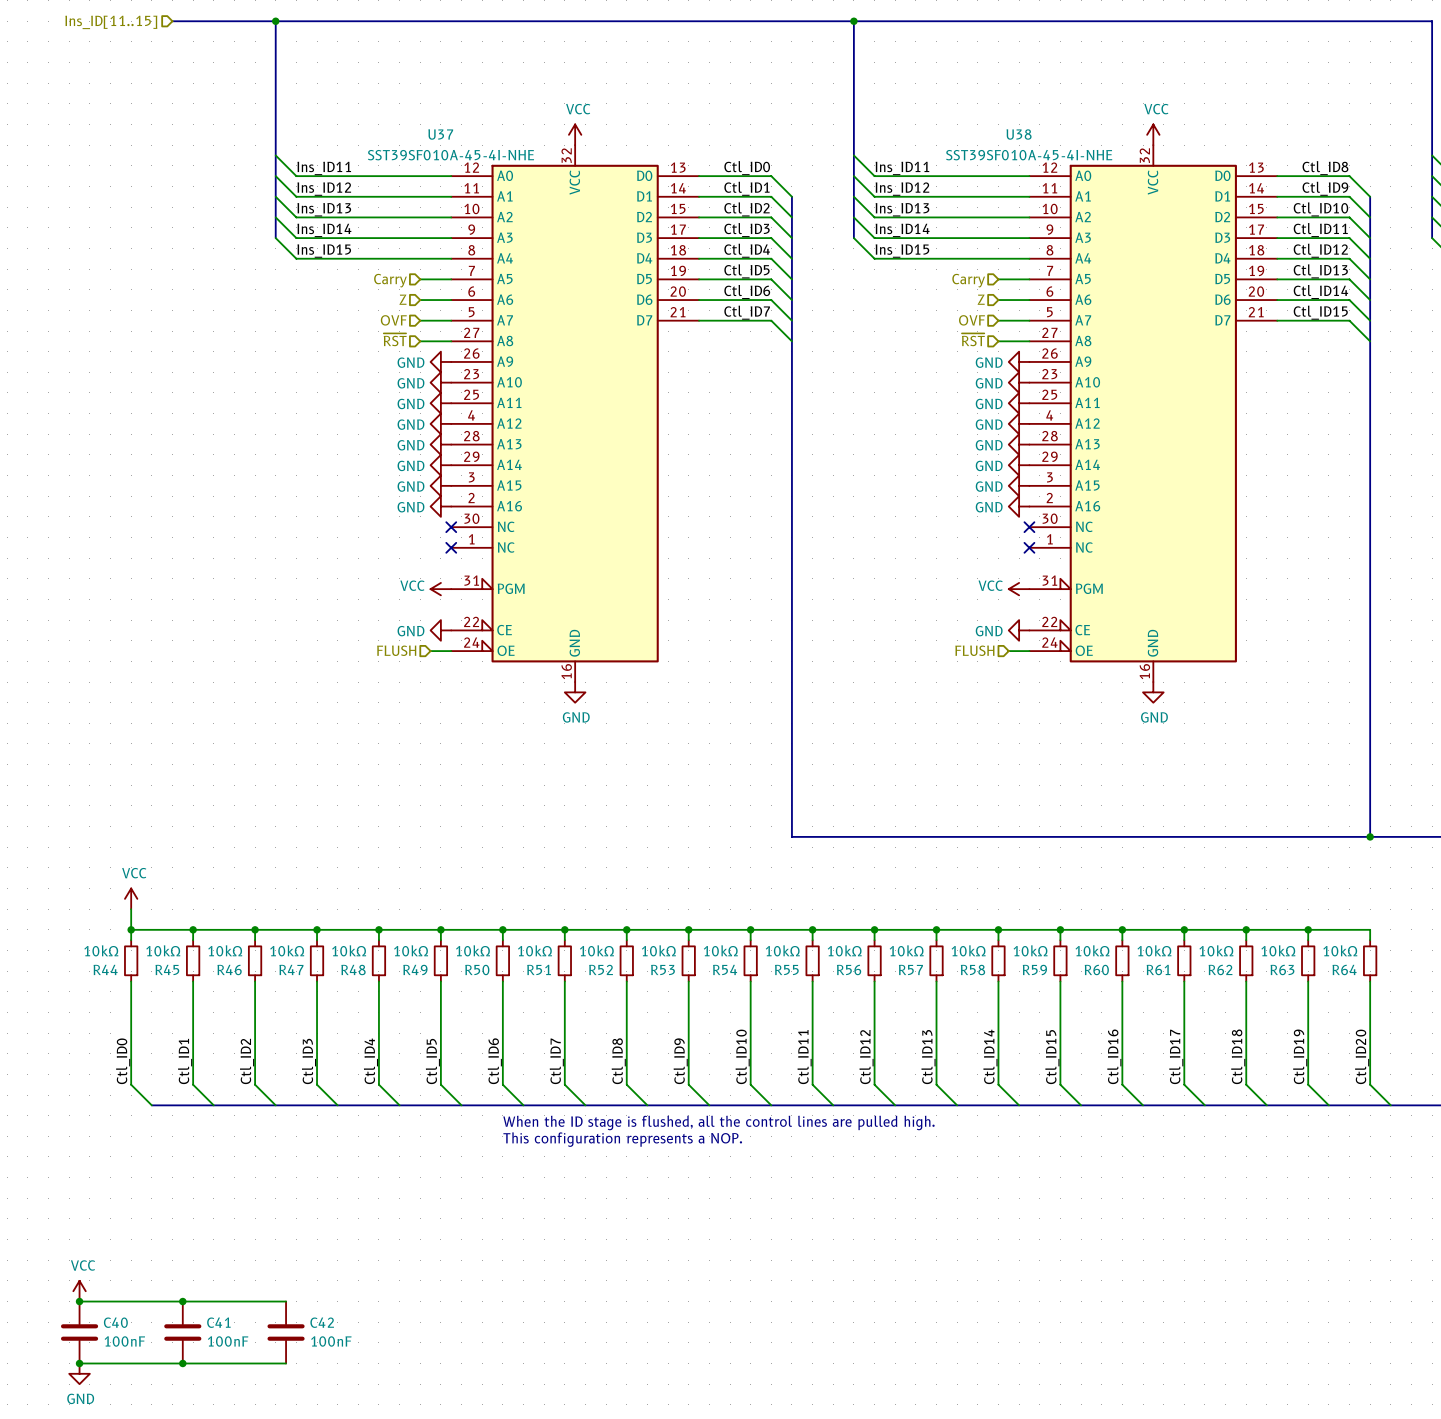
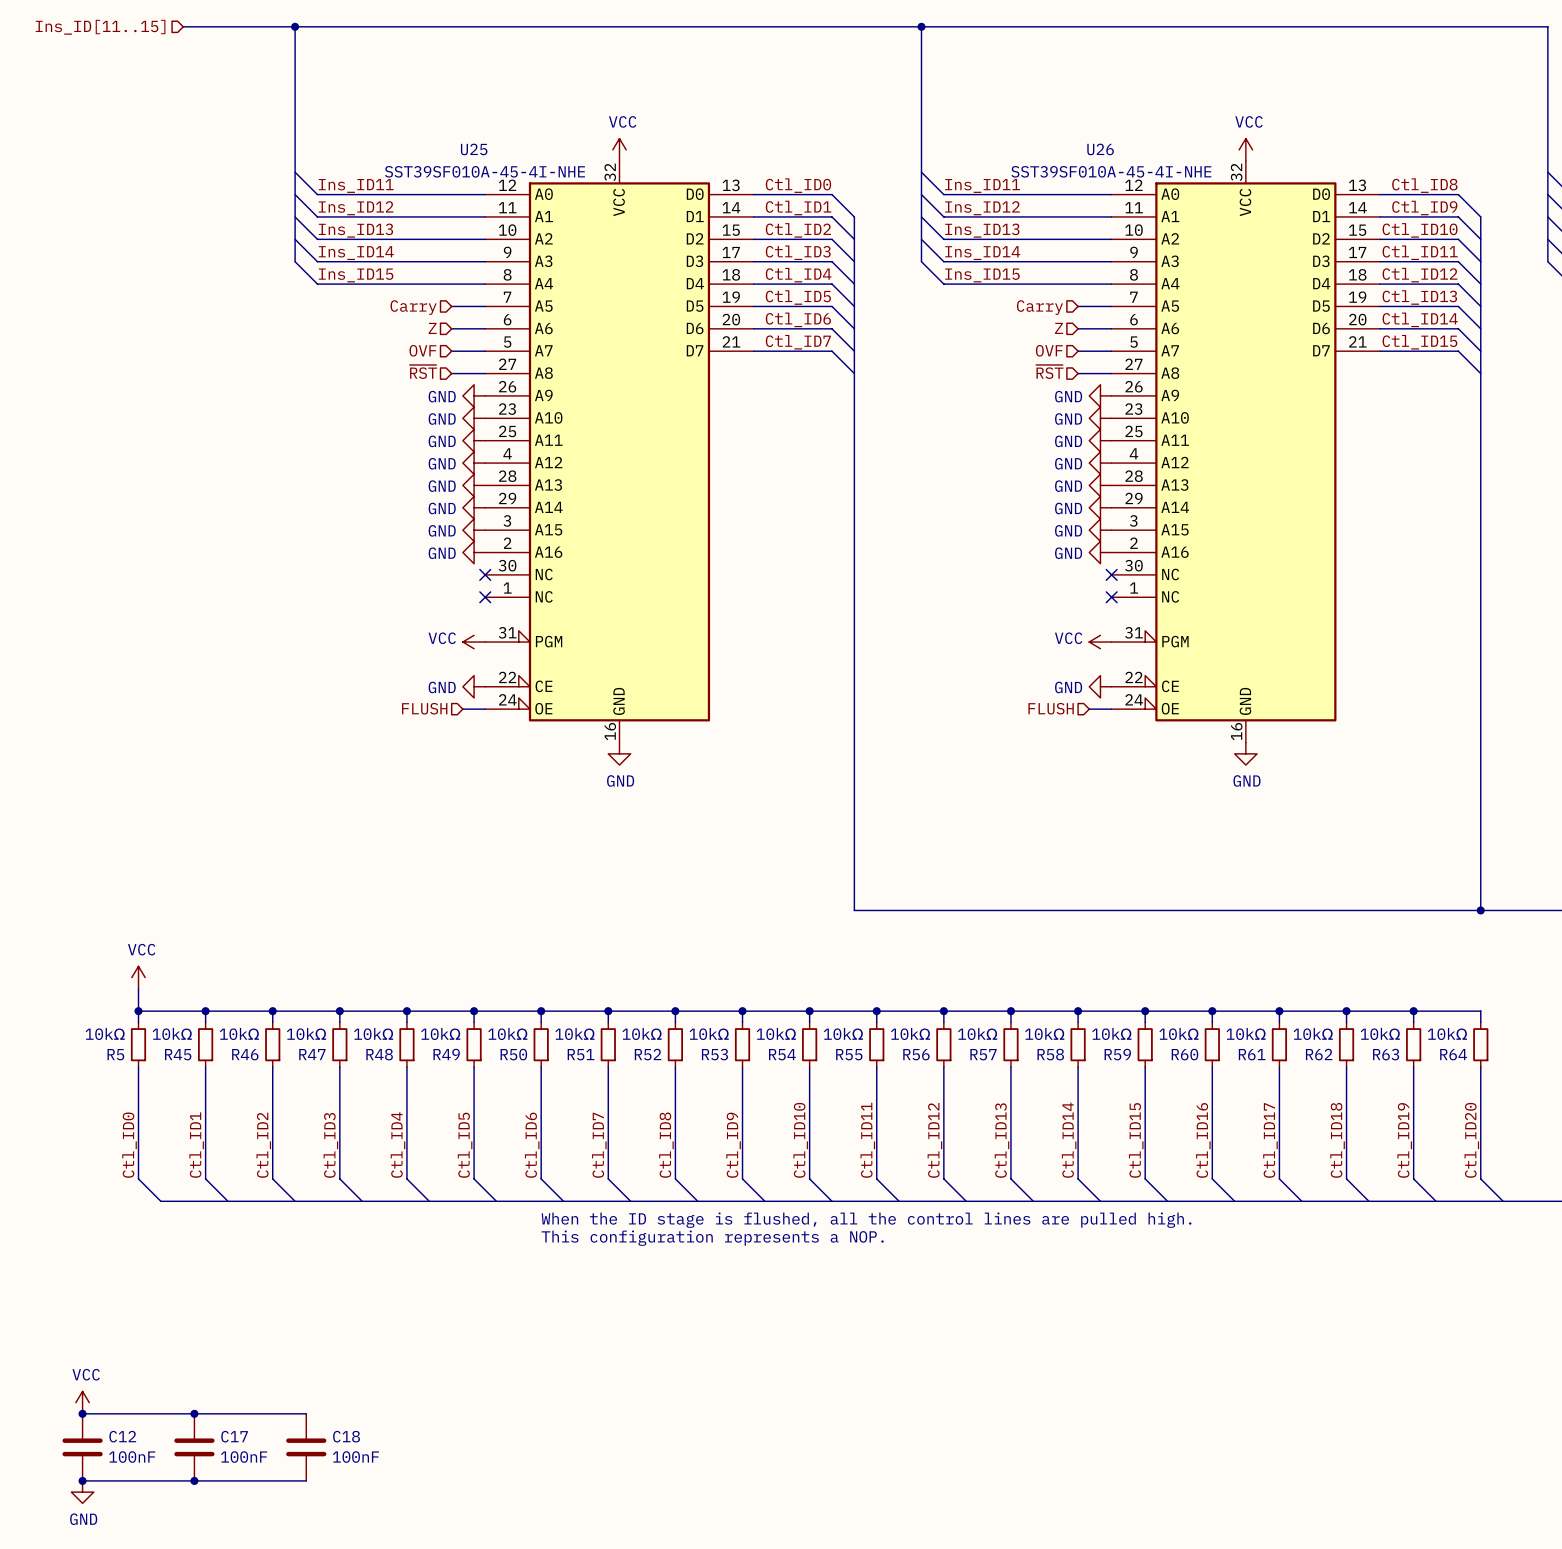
U37 name: U37 (440, 134) -> U25 (474, 149)
U38 name: U38 (1019, 134) -> U26 (1100, 149)
R44 name: R44 (105, 969) -> R5 (115, 1054)
C40 name: C40 (115, 1322) -> C12 (122, 1436)
C41 name: C41 (218, 1322) -> C17 (234, 1436)
C42 name: C42 (322, 1322) -> C18 (346, 1436)

